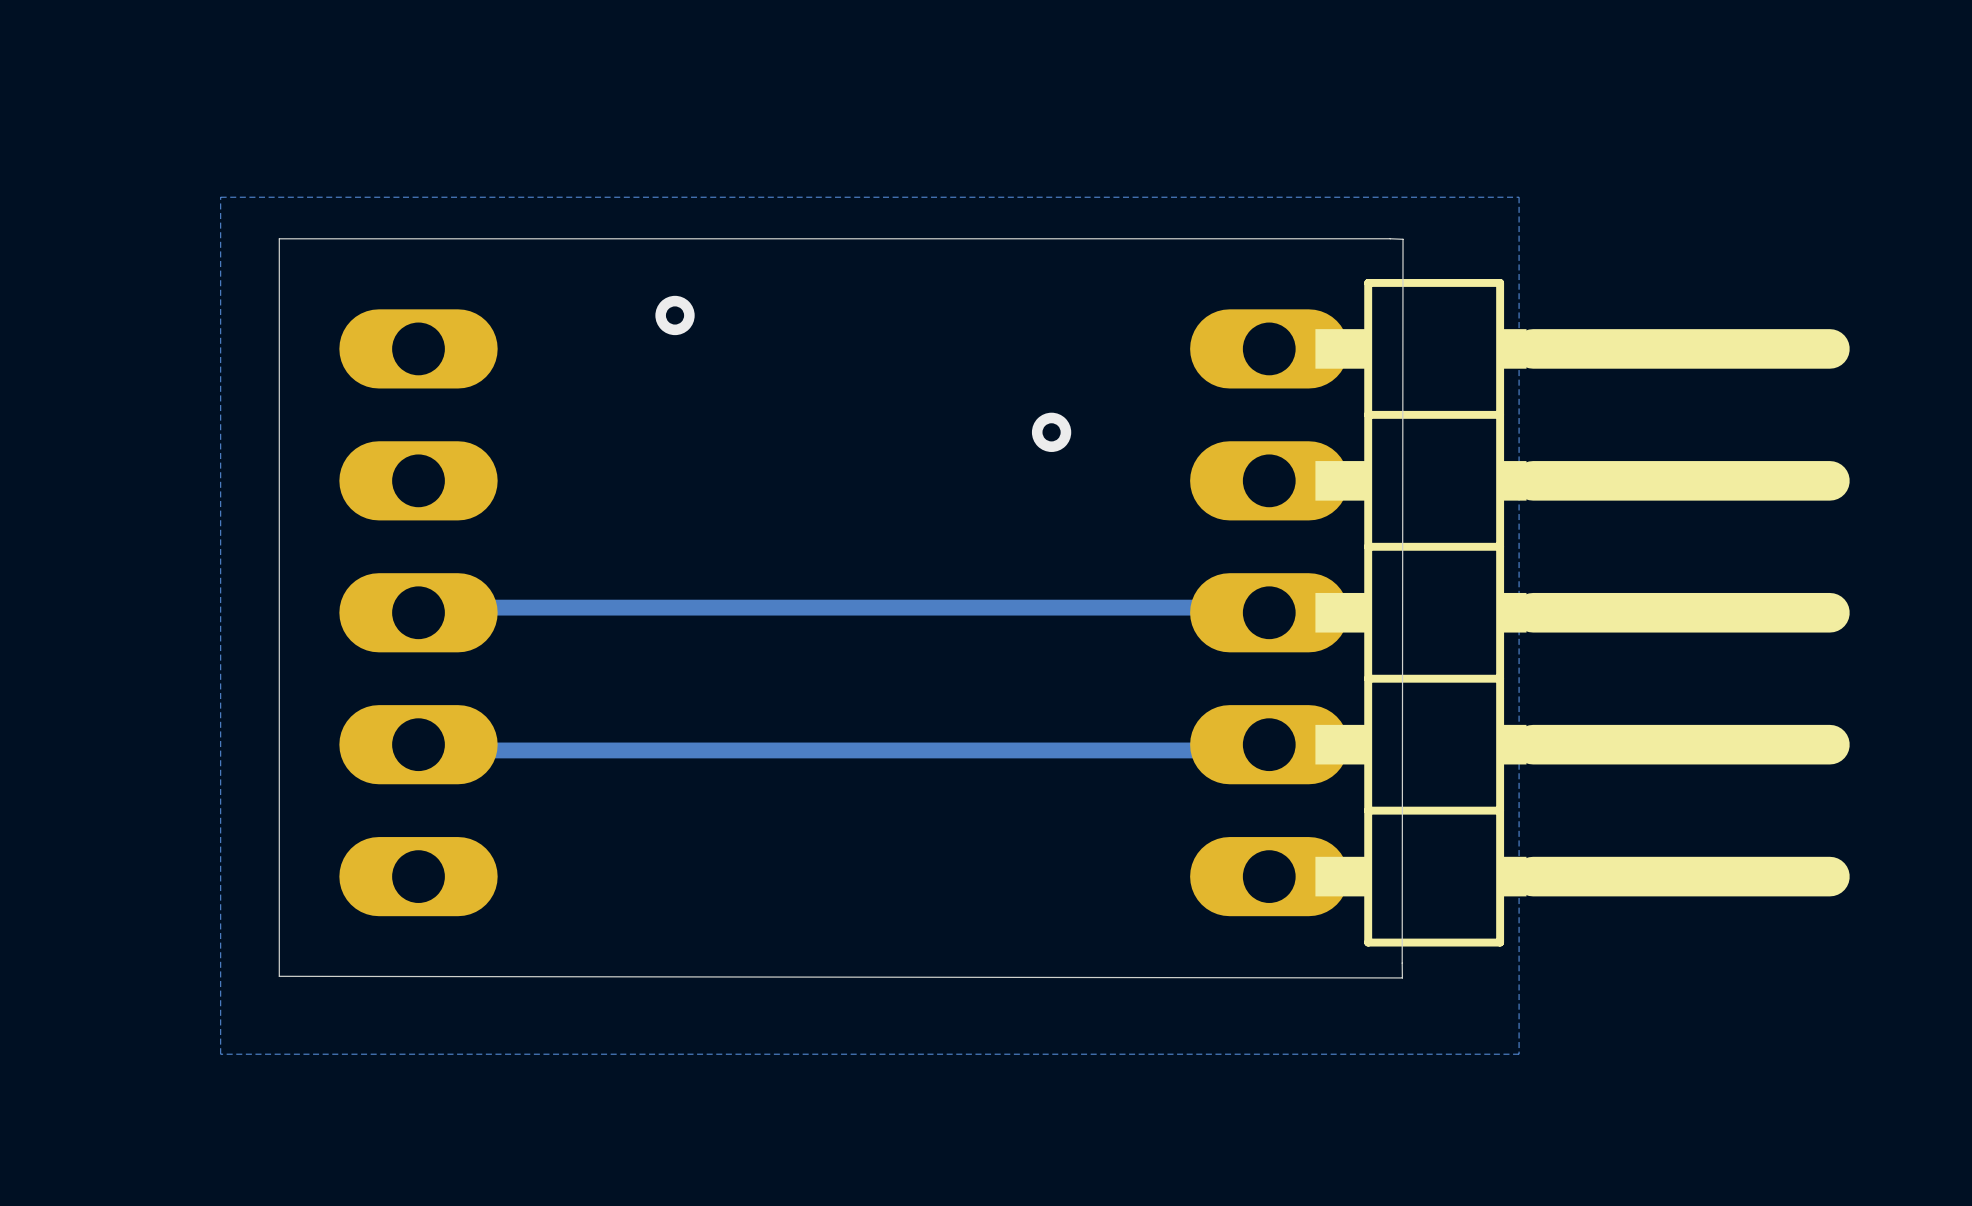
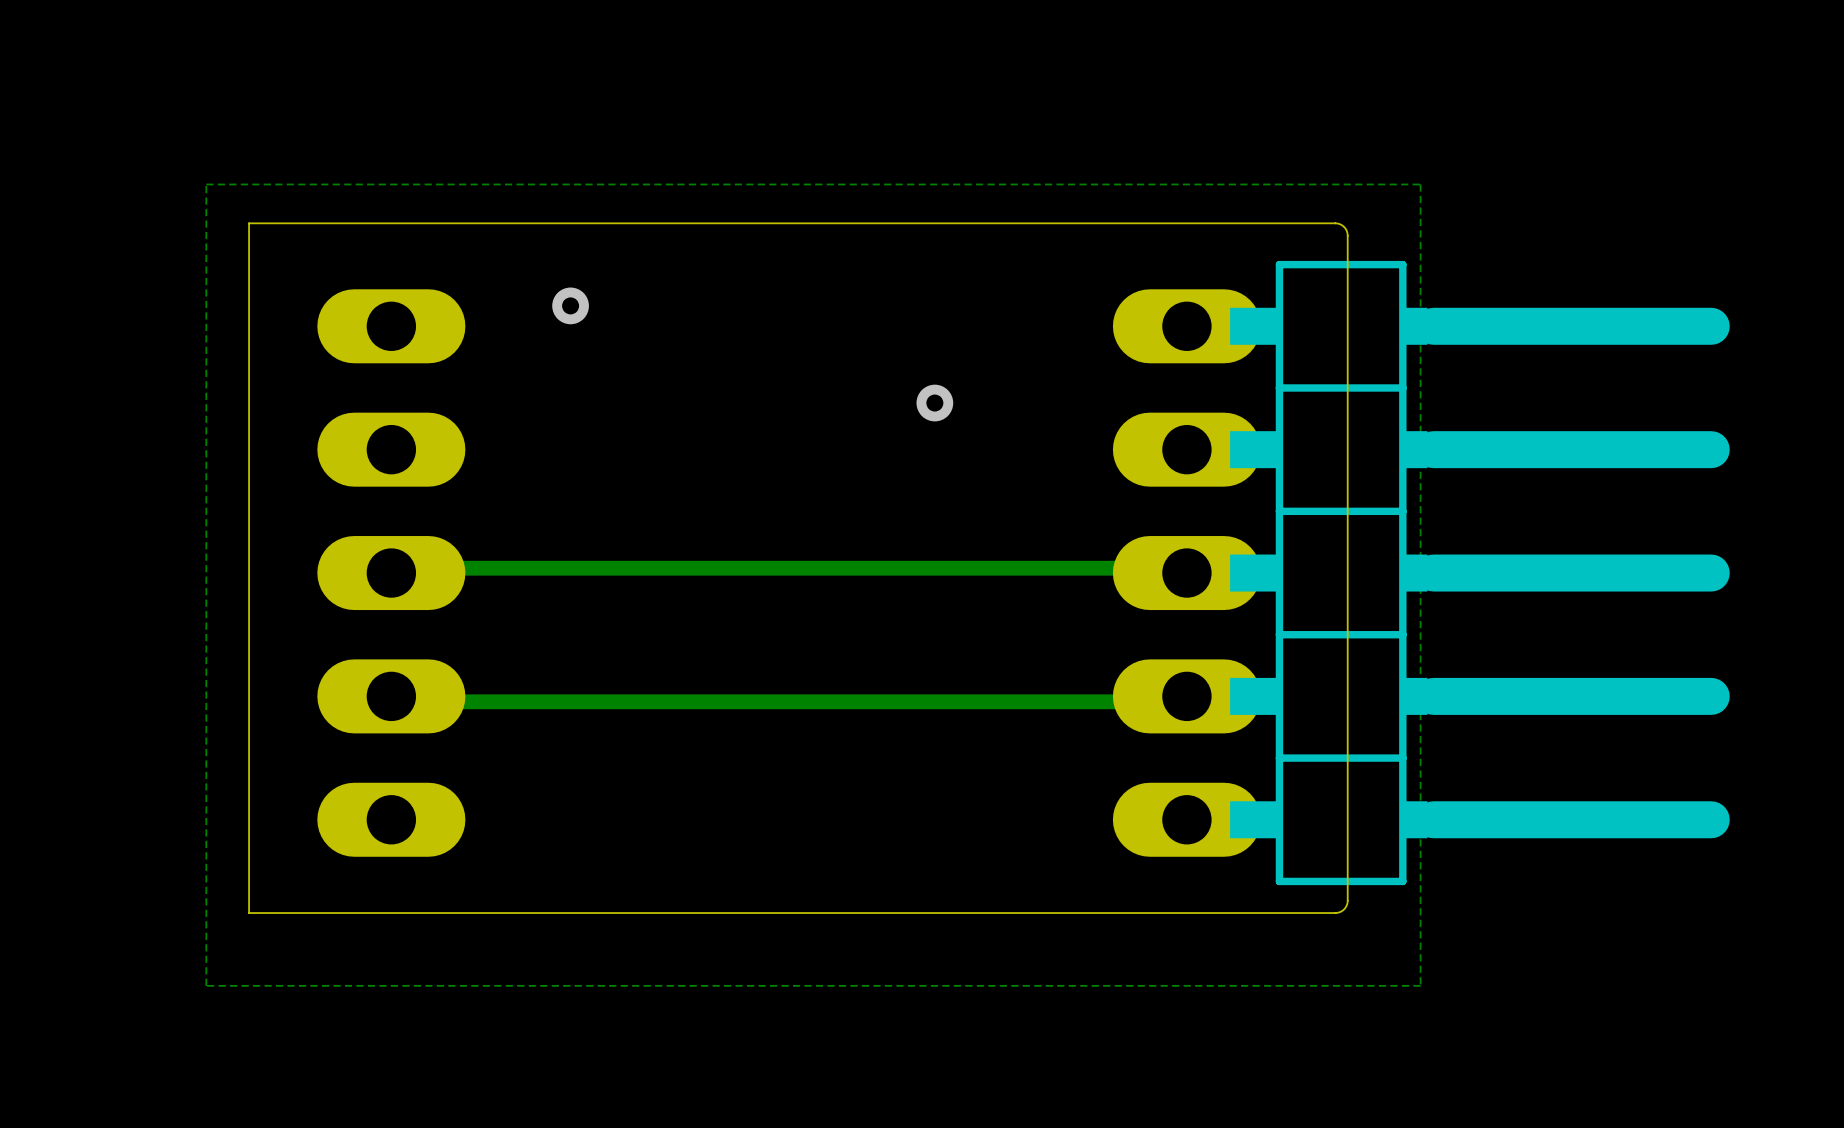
board edge: (1390, 238) (1403, 239) (1402, 977) (279, 976) (279, 238) -> (1300, 223) (1338, 223) (1345, 228) (1347, 235) (1347, 900) (1344, 909) (1335, 913) (249, 913) (249, 223) (261, 223)
via position: (675, 315) -> (570, 305)
via position: (1051, 432) -> (934, 403)

